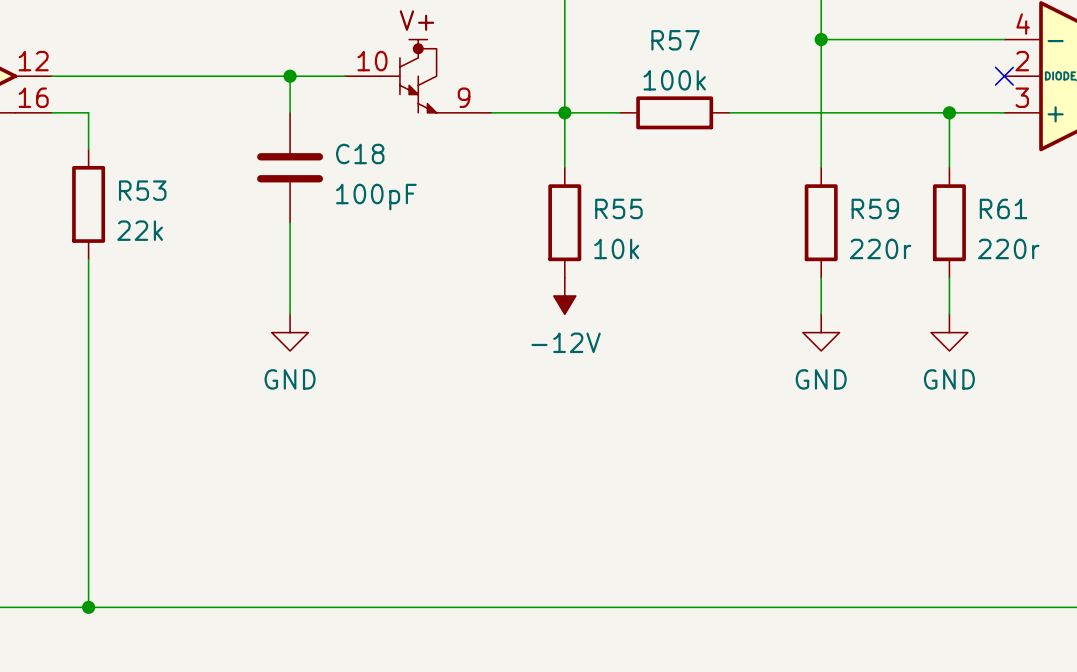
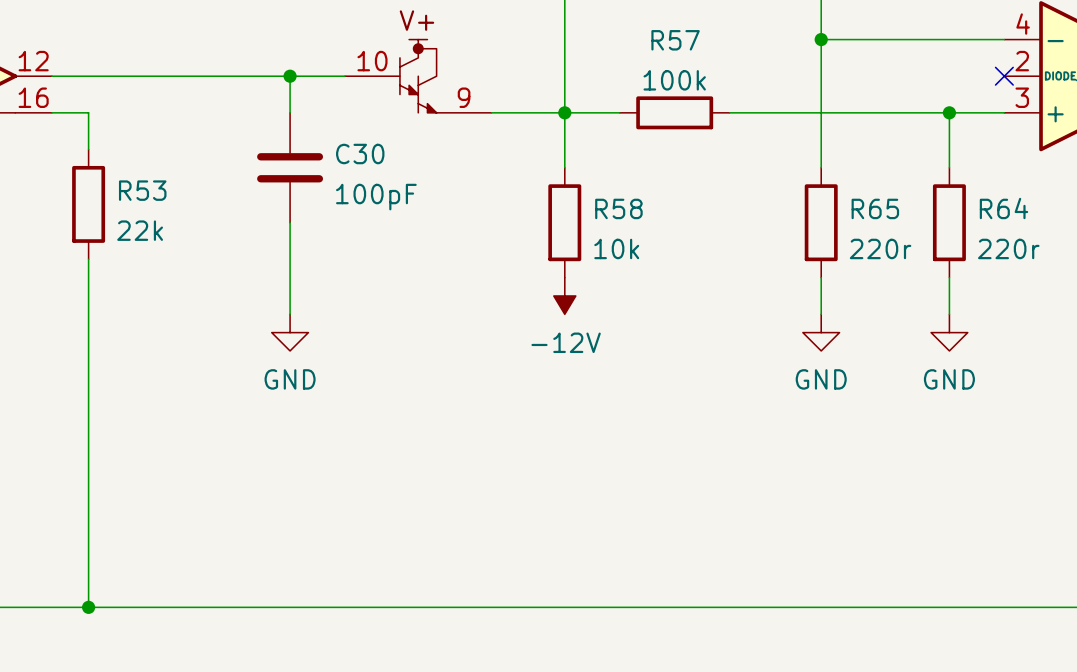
C18 name: C18 (360, 154) -> C30 (360, 154)
R55 name: R55 (618, 208) -> R58 (618, 208)
R59 name: R59 (875, 208) -> R65 (875, 208)
R61 name: R61 (1003, 208) -> R64 (1003, 208)

